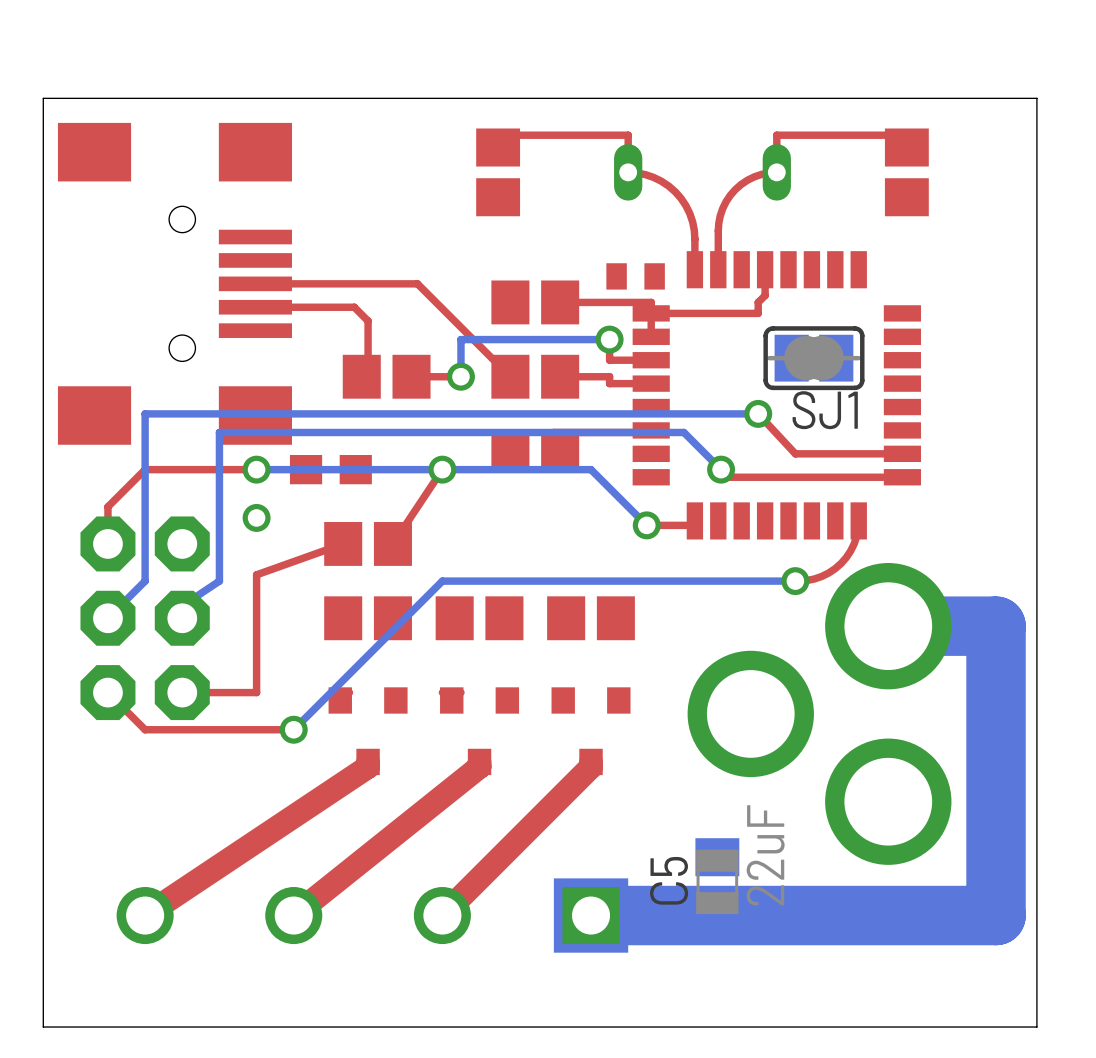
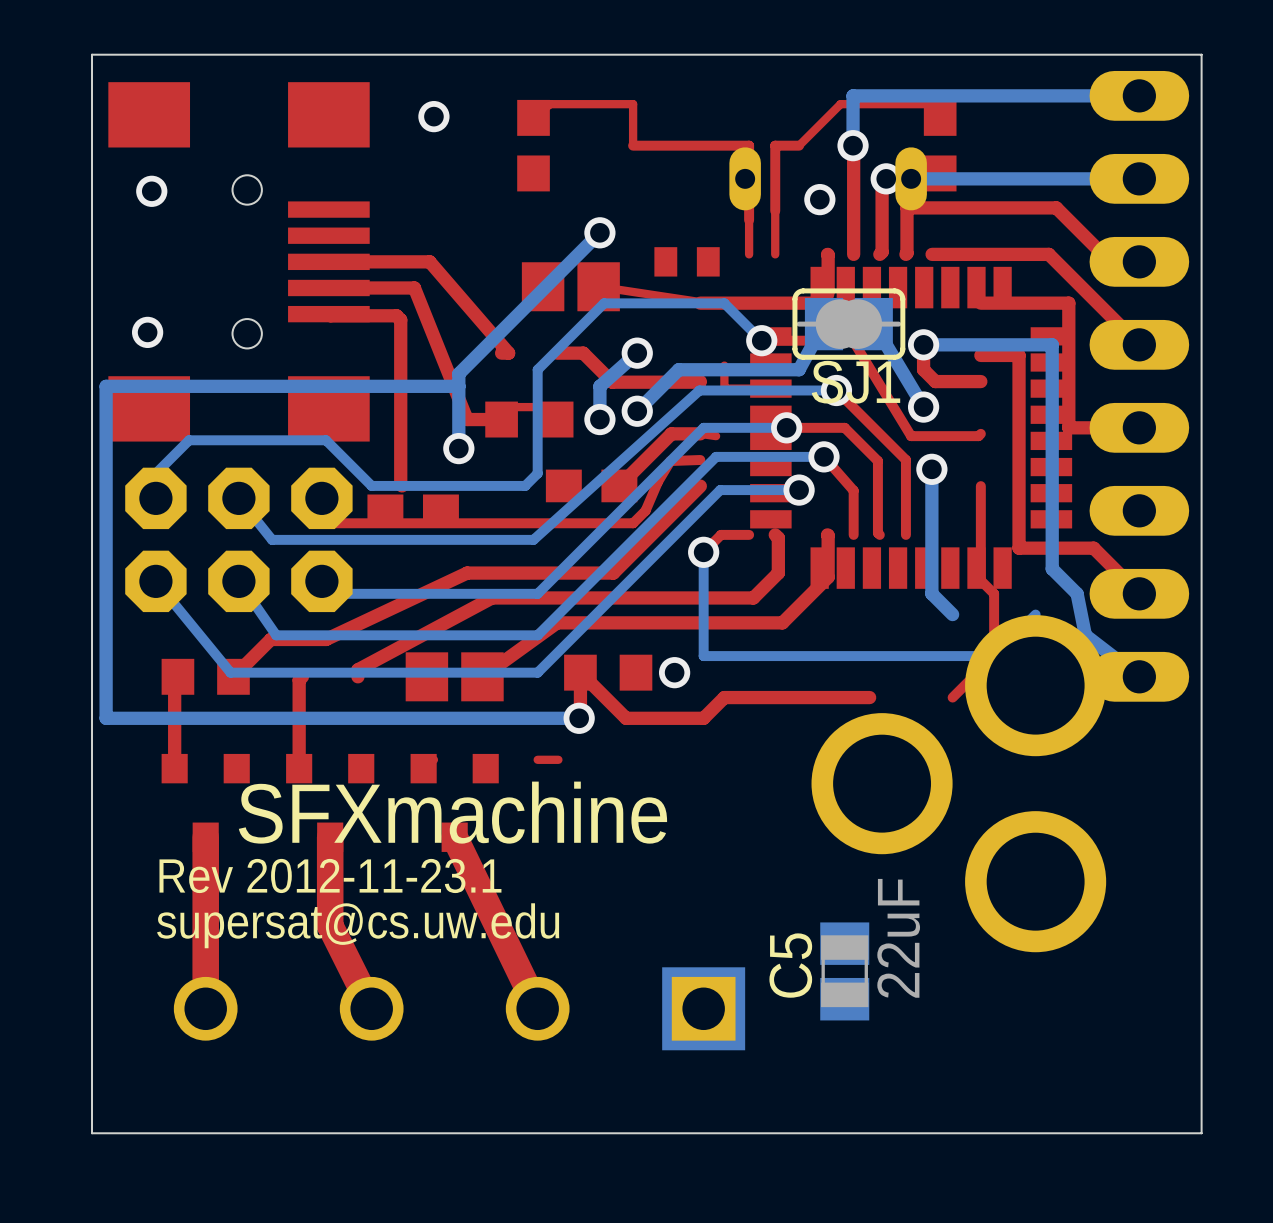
bottom track: none -> (1139, 95) (853, 95) (853, 145)
board edge: (1036, 98) (43, 98) -> (1201, 96) (1201, 54) (92, 54) (92, 96)
via: none -> (433, 116)
top track: none -> (533, 117) (550, 104) (633, 104) (633, 145) (749, 145) (749, 254)
top track: none -> (940, 117) (940, 104) (840, 104) (799, 145) (775, 145) (775, 254)
part: none -> (533, 145)
top track: none -> (853, 145) (853, 254)
via: none -> (853, 145)
part: none -> (940, 145)
top track: (498, 147) (516, 135) (628, 135) (628, 172) (645, 174) (661, 181) (675, 191) (685, 205) (694, 230) (694, 269) -> none
top track: (906, 147) (888, 135) (776, 135) (776, 172) (761, 174) (747, 180) (735, 189) (722, 208) (718, 223) (718, 269) -> none
part: (498, 172) -> none
top track: none -> (886, 178) (882, 178) (882, 252) (879, 254)
via: none -> (886, 178)
part: (906, 172) -> none
bottom track: none -> (1139, 178) (886, 178)
via: none -> (151, 191)
via: none -> (819, 199)
bottom track: none -> (599, 232) (458, 373) (458, 448)
via: none -> (599, 232)
top track: none -> (827, 254) (827, 294) (823, 300) (817, 303) (815, 303) (700, 303) (708, 303) (598, 286) (591, 283)
top track: none -> (905, 254) (906, 207) (1056, 207) (1110, 261) (1139, 261)
top track: none -> (932, 254) (1048, 254) (1139, 344)
top track: none -> (328, 261) (429, 261) (508, 353) (501, 353)
part: none -> (570, 286)
top track: (765, 269) (765, 295) (758, 302) (758, 313) (651, 313) -> none
top track: none -> (328, 287) (414, 287) (467, 419) (501, 419)
part position: (635, 276) -> (687, 261)
part position: (174, 283) -> (239, 261)
top track: (255, 283) (417, 283) (510, 376) -> none
top track: none -> (980, 303) (1068, 303) (1068, 427) (1139, 427)
top track: none -> (328, 314) (330, 315) (396, 315) (400, 319) (402, 485)
top track: (553, 296) (560, 302) (651, 302) (651, 336) -> none
part: (535, 302) -> none
bottom track: none -> (823, 324) (799, 369) (678, 369) (637, 411)
bottom track: none -> (873, 324) (923, 407)
top track: (255, 307) (354, 307) (368, 321) (368, 370) (361, 376) (368, 376) -> none
via: none -> (147, 332)
top track: none -> (761, 340) (853, 340) (911, 436) (978, 436) (980, 433)
bottom track: none -> (761, 340) (724, 303) (604, 303) (537, 369) (537, 473) (525, 485) (371, 485) (326, 440) (189, 440) (139, 490) (155, 498)
via: none -> (761, 340)
top track: none -> (923, 344) (923, 369) (935, 381) (980, 381)
bottom track: none -> (923, 344) (1052, 344) (1052, 568) (1077, 593) (1085, 635) (1139, 676)
via: none -> (923, 344)
top track: none -> (557, 353) (583, 353) (612, 382) (700, 381)
bottom track: none -> (637, 353) (599, 386) (599, 419)
via: none -> (637, 353)
top track: none -> (980, 355) (1019, 355) (1019, 548) (1093, 548) (1139, 593)
bottom track: (609, 339) (460, 339) (460, 376) -> none
via: (609, 339) -> none
bottom track: none -> (458, 386) (106, 386) (106, 718) (579, 718)
SJ1 position: (813, 358) -> (848, 324)
part: none -> (1139, 386)
top track: none -> (836, 390) (905, 459) (905, 534)
bottom track: none -> (836, 390) (699, 390) (533, 539) (272, 539) (238, 498)
via: none -> (836, 390)
part: (386, 376) -> none
via: (460, 376) -> none
part: (535, 376) -> none
top track: (560, 376) (609, 376) (609, 383) (651, 383) -> none
via: none -> (923, 407)
via: none -> (637, 411)
part: none -> (529, 419)
via: none -> (599, 419)
top track: none -> (786, 427) (844, 427) (877, 461) (877, 533) (879, 534)
bottom track: none -> (786, 427) (703, 427) (537, 593) (317, 593) (321, 581)
via: none -> (786, 427)
top track: none -> (716, 436) (671, 433) (619, 485)
via: none -> (458, 448)
top track: (758, 413) (795, 453) (902, 453) -> none
bottom track: (758, 413) (145, 413) (145, 581) (107, 618) -> none
via: (758, 413) -> none
top track: none -> (823, 456) (853, 490) (853, 534)
bottom track: none -> (823, 456) (716, 456) (537, 635) (276, 635) (238, 581)
via: none -> (823, 456)
top track: none -> (700, 459) (670, 461) (658, 481) (645, 510) (633, 523) (334, 523) (309, 498) (321, 498)
bottom track: none -> (931, 469) (931, 593) (952, 614)
via: none -> (931, 469)
part: none -> (591, 485)
top track: none -> (700, 486) (613, 573) (467, 573) (326, 639) (270, 639) (233, 676)
top track: none -> (980, 486) (980, 580) (994, 593) (994, 656) (952, 697)
part: (535, 451) -> none
bottom track: none -> (799, 490) (720, 490) (537, 672) (230, 672) (155, 581)
via: none -> (799, 490)
top track: (256, 469) (145, 469) (107, 506) (107, 543) -> none
bottom track: (256, 469) (591, 469) (646, 525) -> none
via: (256, 469) -> none
top track: (442, 469) (392, 543) -> none
via: (442, 469) -> none
top track: (721, 469) (728, 477) (902, 477) -> none
bottom track: (721, 469) (683, 432) (219, 432) (219, 581) (174, 610) (182, 618) -> none
via: (721, 469) -> none
top track: none -> (749, 534) (721, 534) (703, 552)
top track: none -> (775, 534) (778, 538) (778, 573) (753, 597) (492, 597) (357, 669) (357, 676)
top track: none -> (827, 534) (828, 577) (782, 622) (557, 622) (482, 676)
part: none -> (238, 539)
bottom track: none -> (703, 552) (703, 656) (994, 656) (1035, 614)
via: none -> (703, 552)
part footprint: [80, 516, 210, 721] -> [161, 658, 250, 695]
via: (256, 517) -> none
top track: (694, 520) (690, 525) (646, 525) -> none
top track: (858, 520) (854, 543) (841, 563) (821, 576) (795, 581) -> none
via: (646, 525) -> none
top track: (343, 543) (256, 574) (256, 692) (182, 692) -> none
part: (368, 543) -> none
bottom track: (795, 581) (442, 581) (293, 729) -> none
via: (795, 581) -> none
part footprint: [435, 596, 524, 641] -> [564, 654, 653, 691]
via: none -> (674, 672)
top track: none -> (177, 676) (174, 680) (174, 768)
top track: none -> (302, 676) (299, 680) (299, 768)
part: (591, 618) -> none
bottom track: (888, 626) (996, 626) (996, 915) (591, 915) -> none
top track: none -> (869, 697) (724, 697) (703, 718) (626, 718) (580, 672) (579, 718)
via: none -> (579, 718)
top track: (107, 692) (145, 729) (293, 729) -> none
via: (293, 729) -> none
part: none -> (205, 802)
part: none -> (330, 802)
part: (479, 731) -> none
part: (591, 731) -> none
text: none -> SFXmachine (452, 812)
top track: (368, 761) (368, 766) (145, 915) -> (205, 837) (205, 1008)
top track: (479, 761) (479, 766) (293, 915) -> (330, 837) (330, 925) (371, 1008)
top track: (591, 761) (591, 766) (442, 915) -> (454, 837) (537, 1008)
text: none -> Rev 2012-11-23.1 (330, 875)
text: none -> supersat@cs.uw.edu (358, 925)

